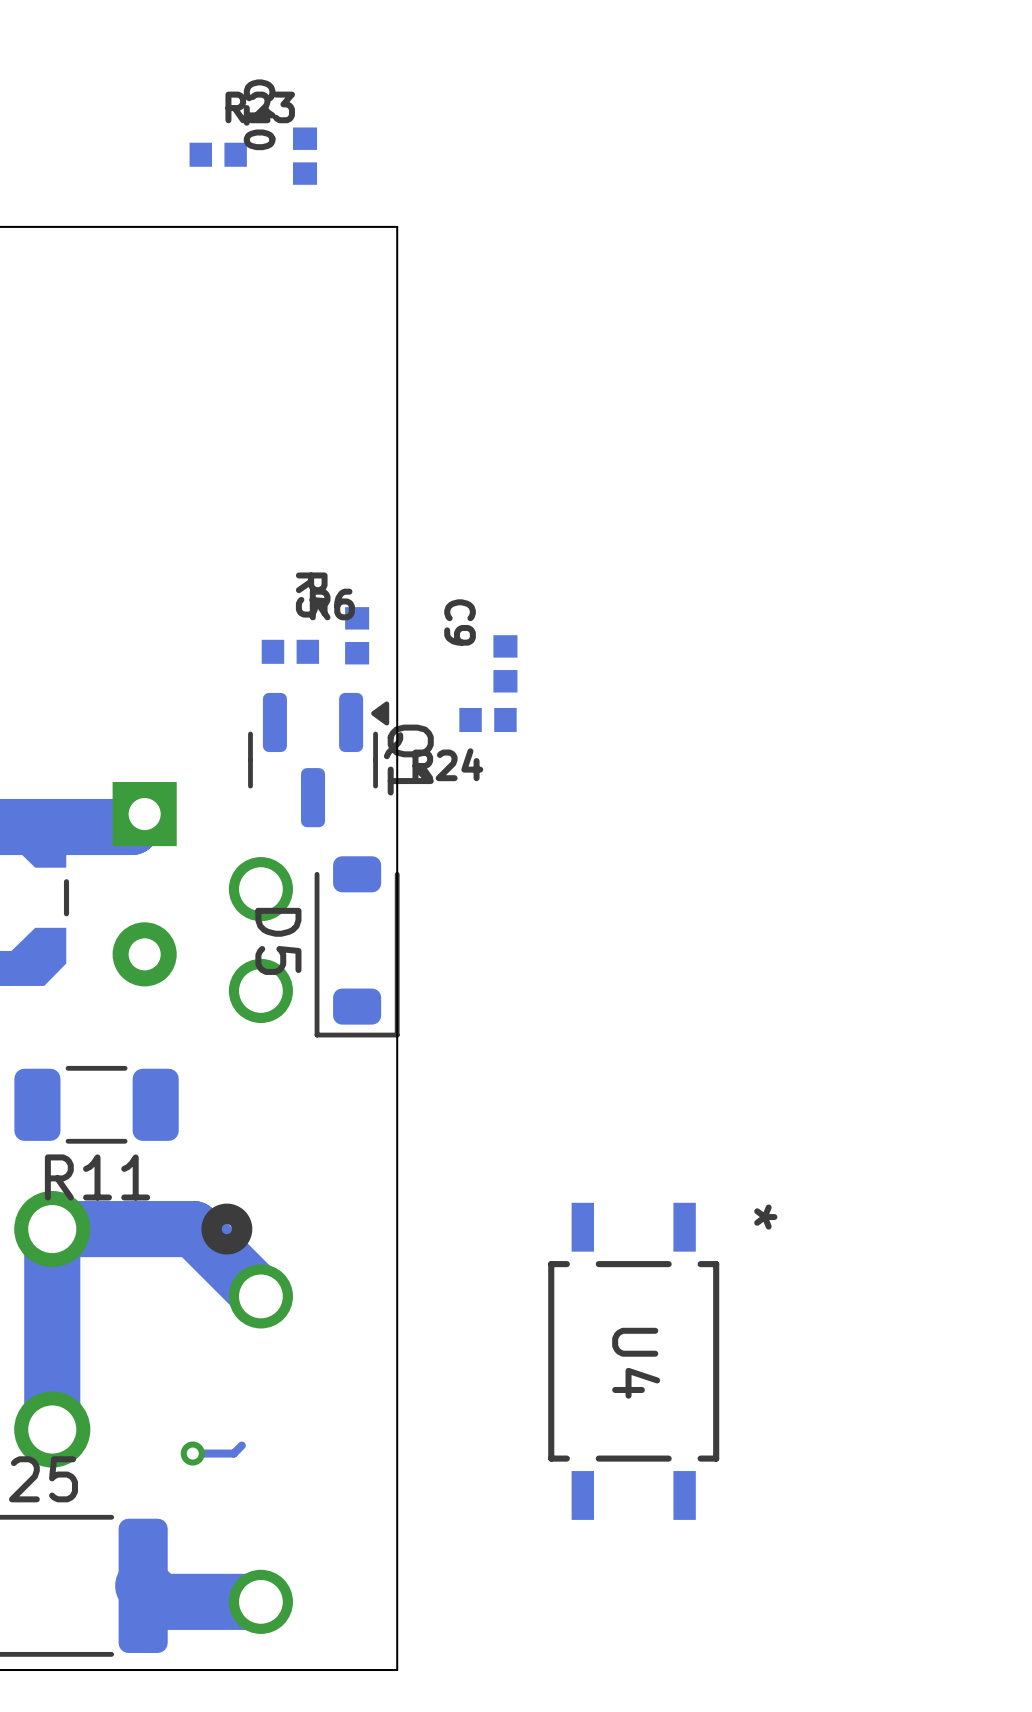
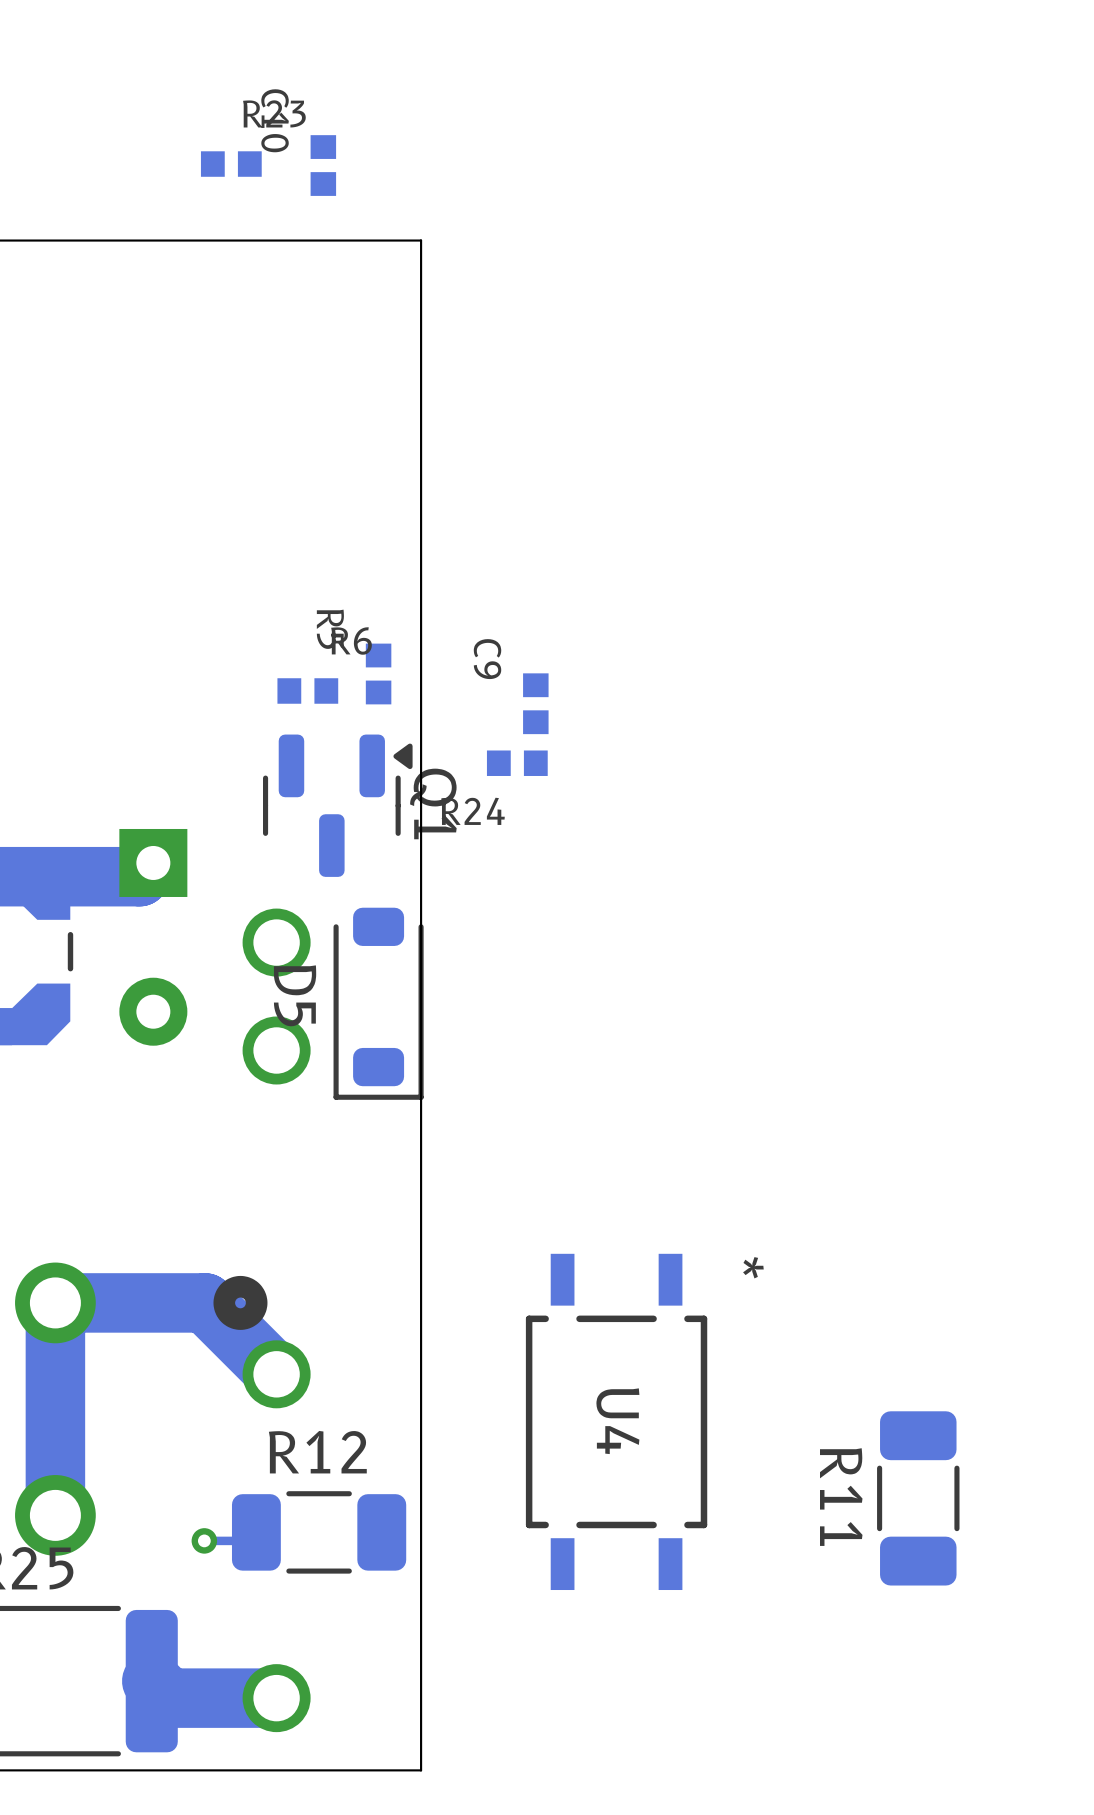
R11 rotation: 0° (96, 1104) -> 90° clockwise (918, 1498)
R11 position: (96, 1104) -> (918, 1498)
U4 position: (633, 1361) -> (616, 1421)
R12: none -> (319, 1532)

